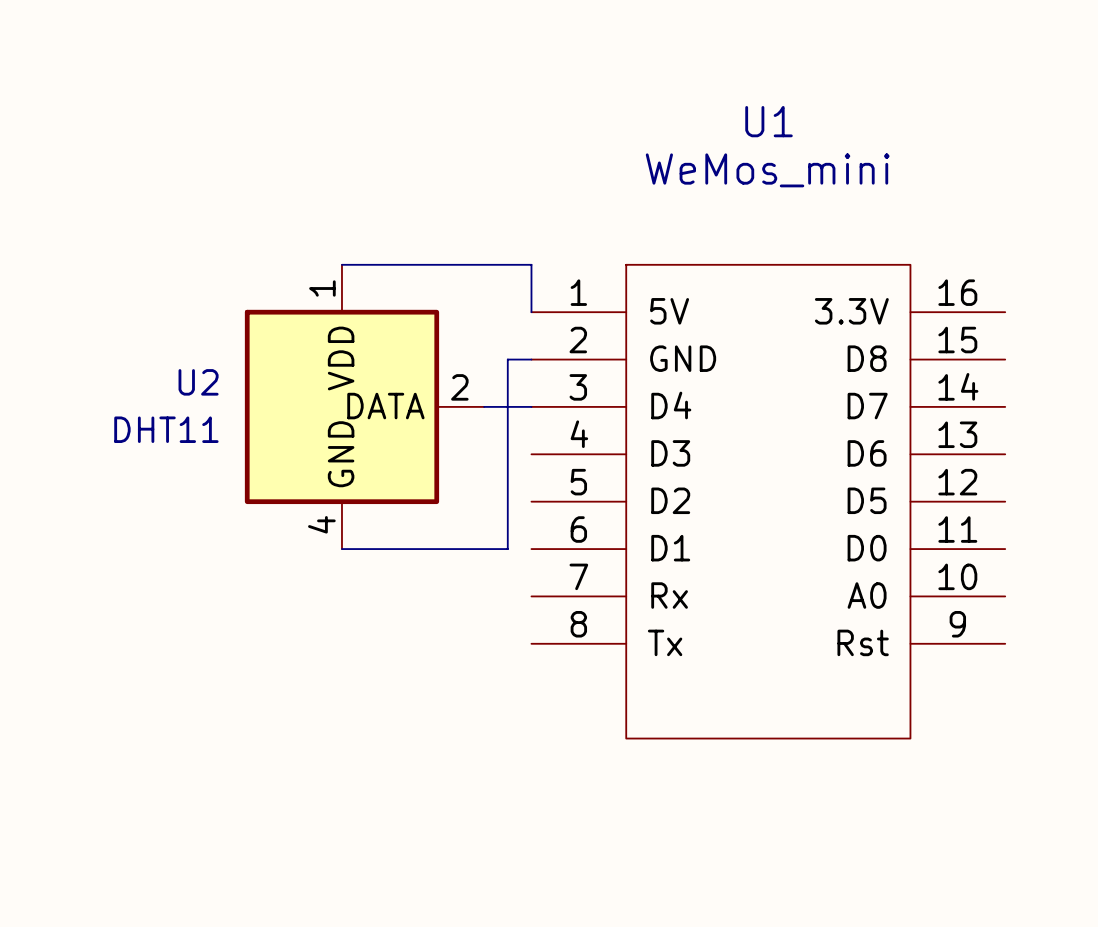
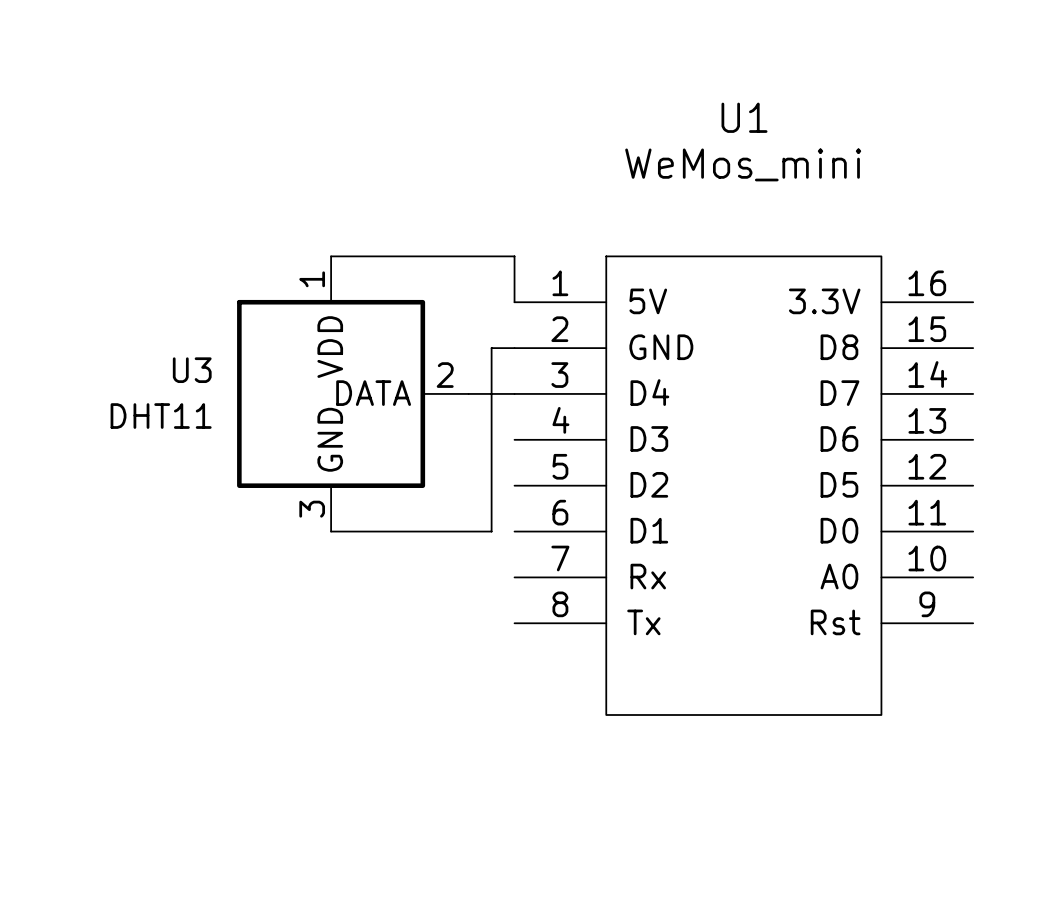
U2 name: U2 (198, 382) -> U3 (192, 370)
U2 pin number: 4 (321, 524) -> 3 (312, 509)

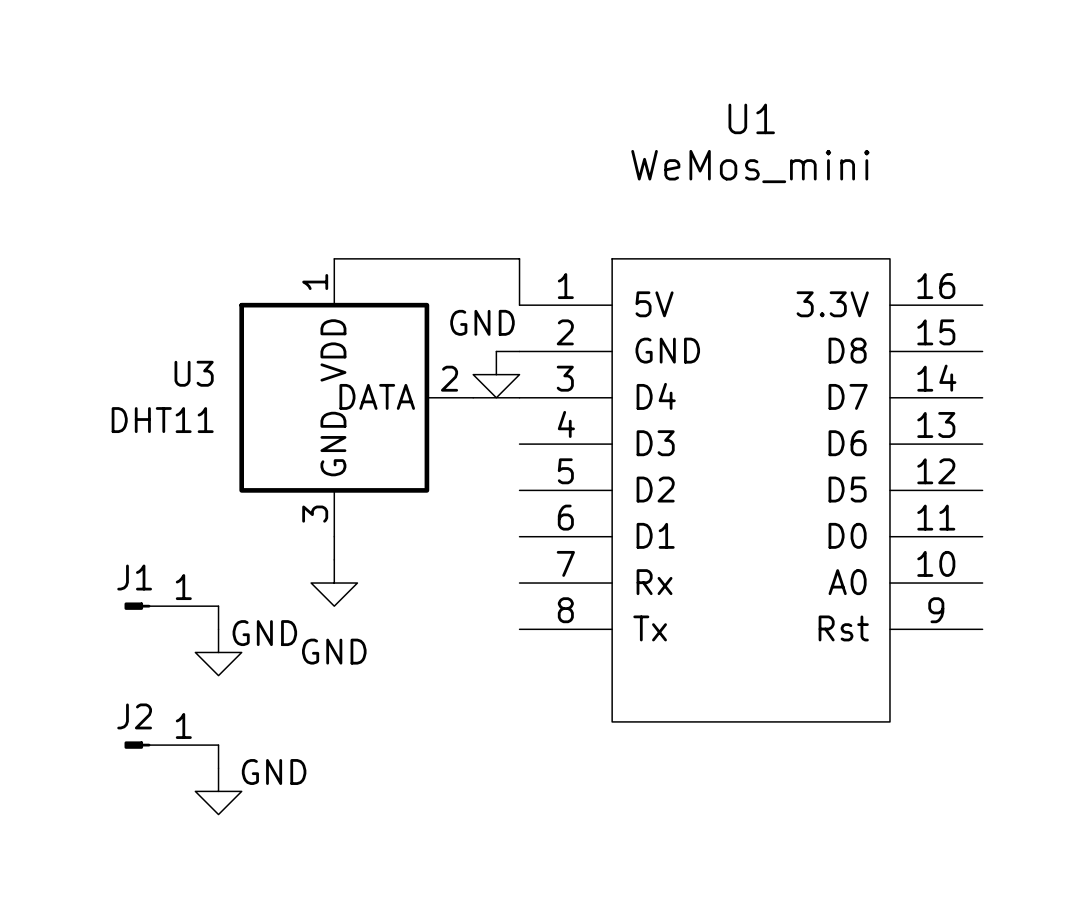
wire: (491, 348) (491, 531) (331, 531) -> (334, 559) (334, 536)
power symbol: none -> GND (496, 374)
power symbol: none -> GND (334, 583)
J1: none -> (171, 606)
wire: none -> (218, 606) (218, 629)
power symbol: none -> GND (218, 652)
J2: none -> (171, 745)
wire: none -> (218, 745) (218, 768)
power symbol: none -> GND (218, 791)

